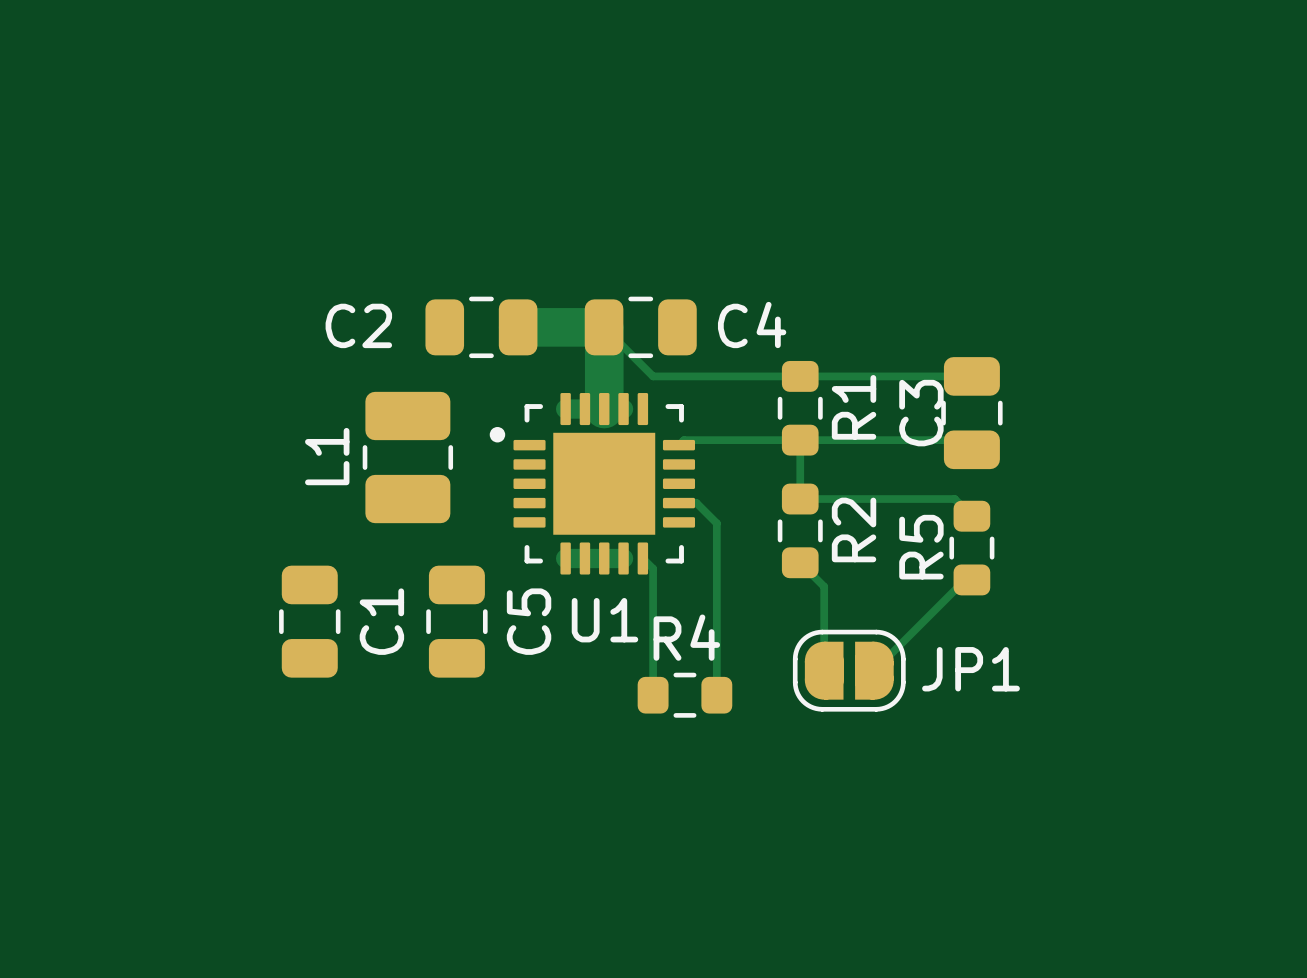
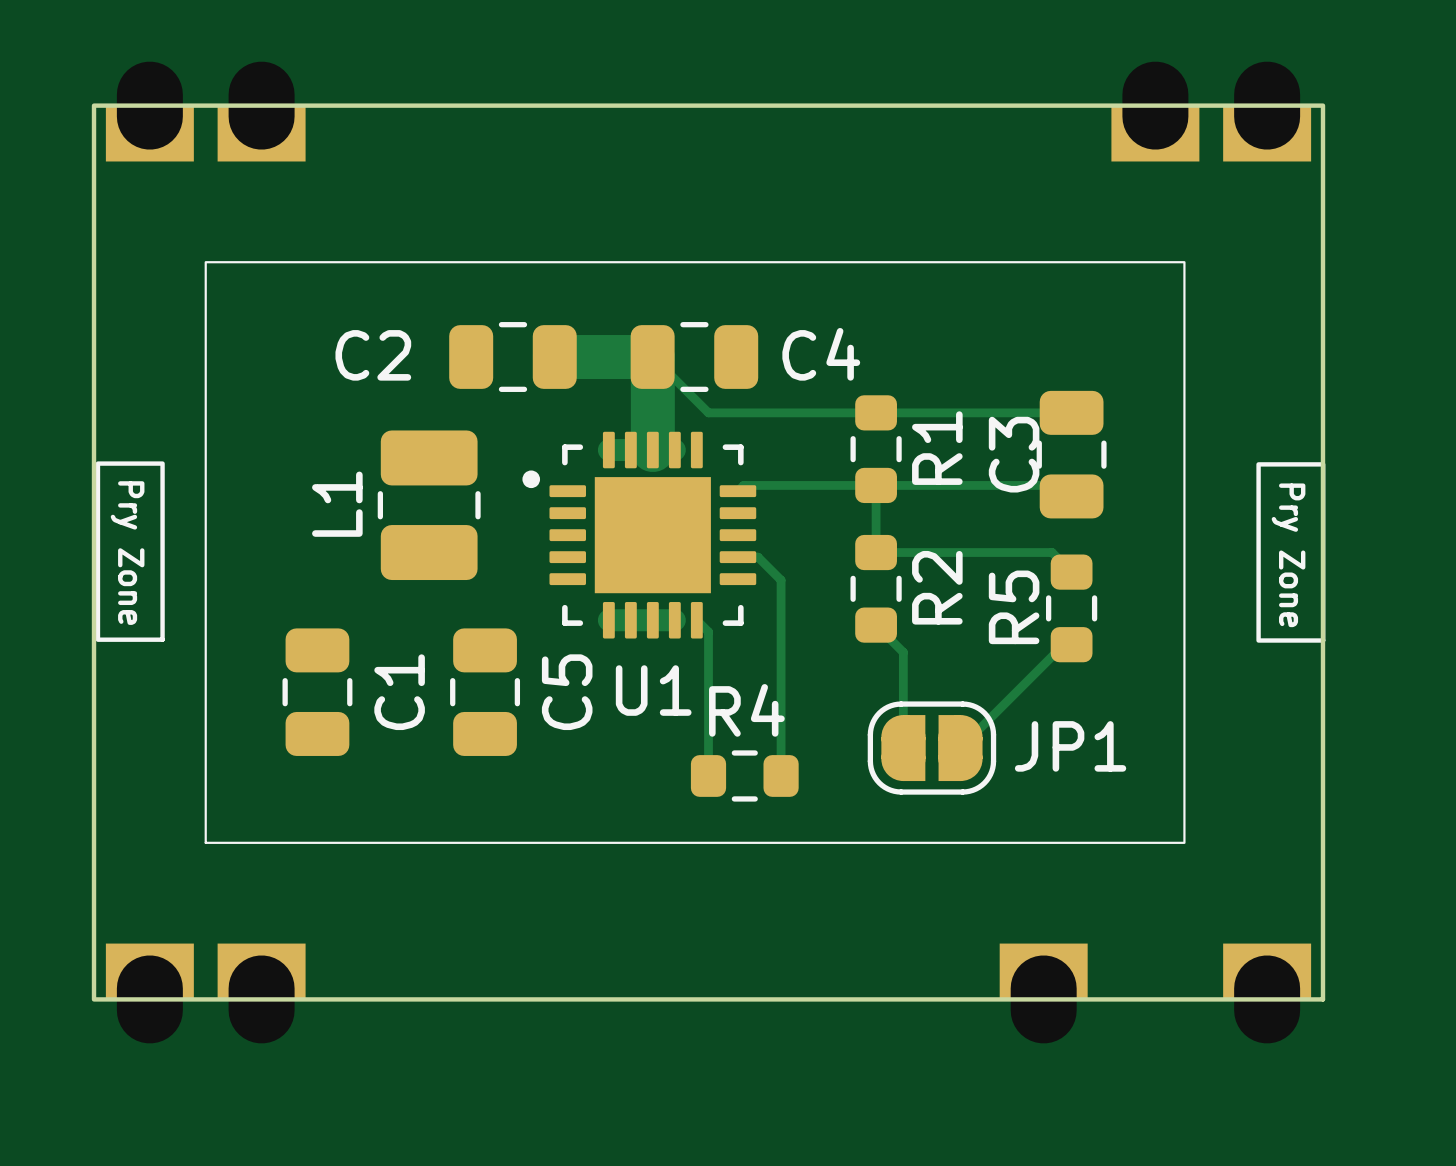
part: none -> (708, 552)

